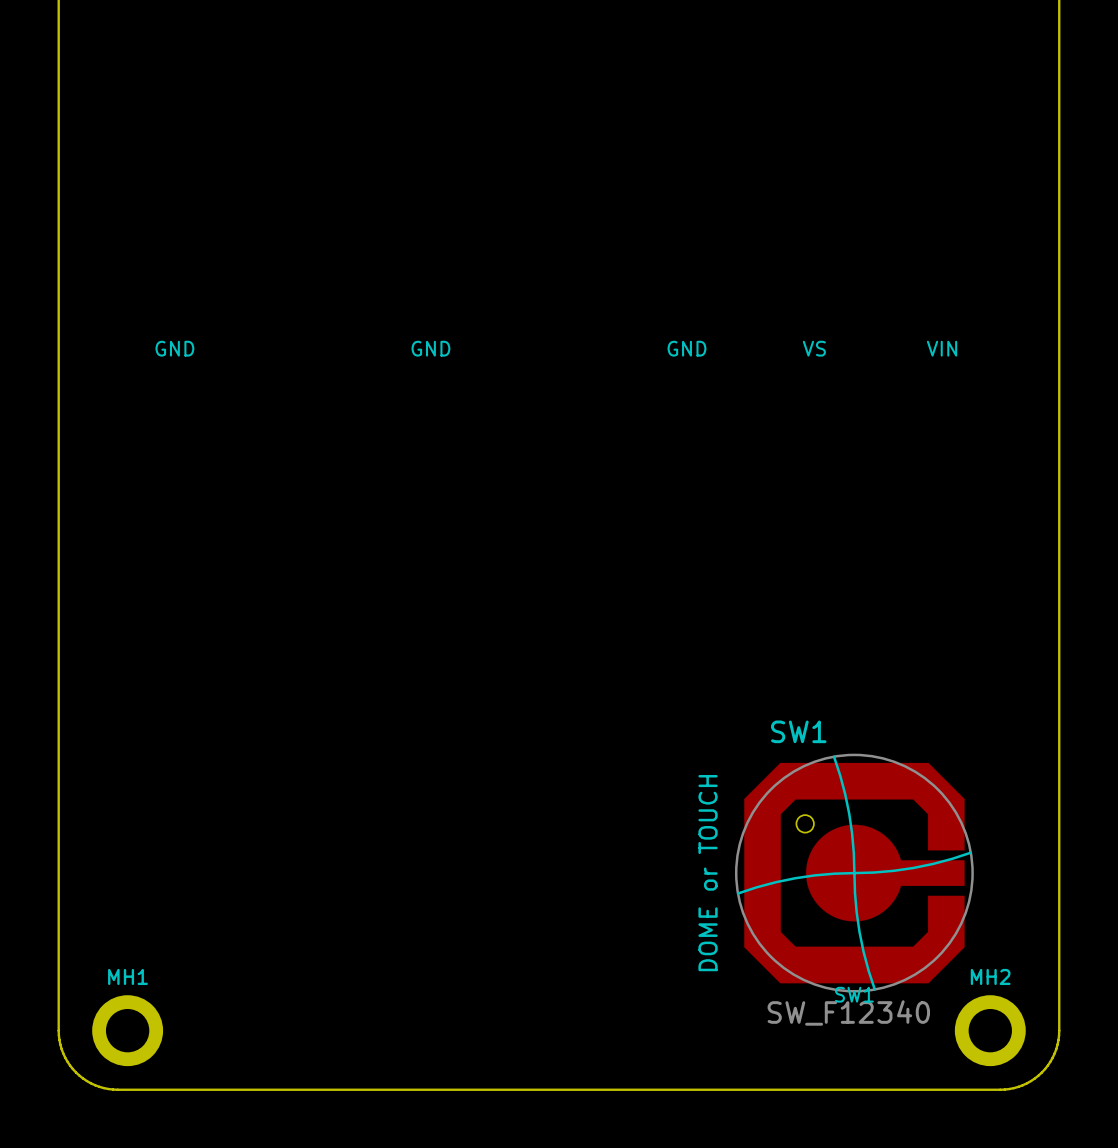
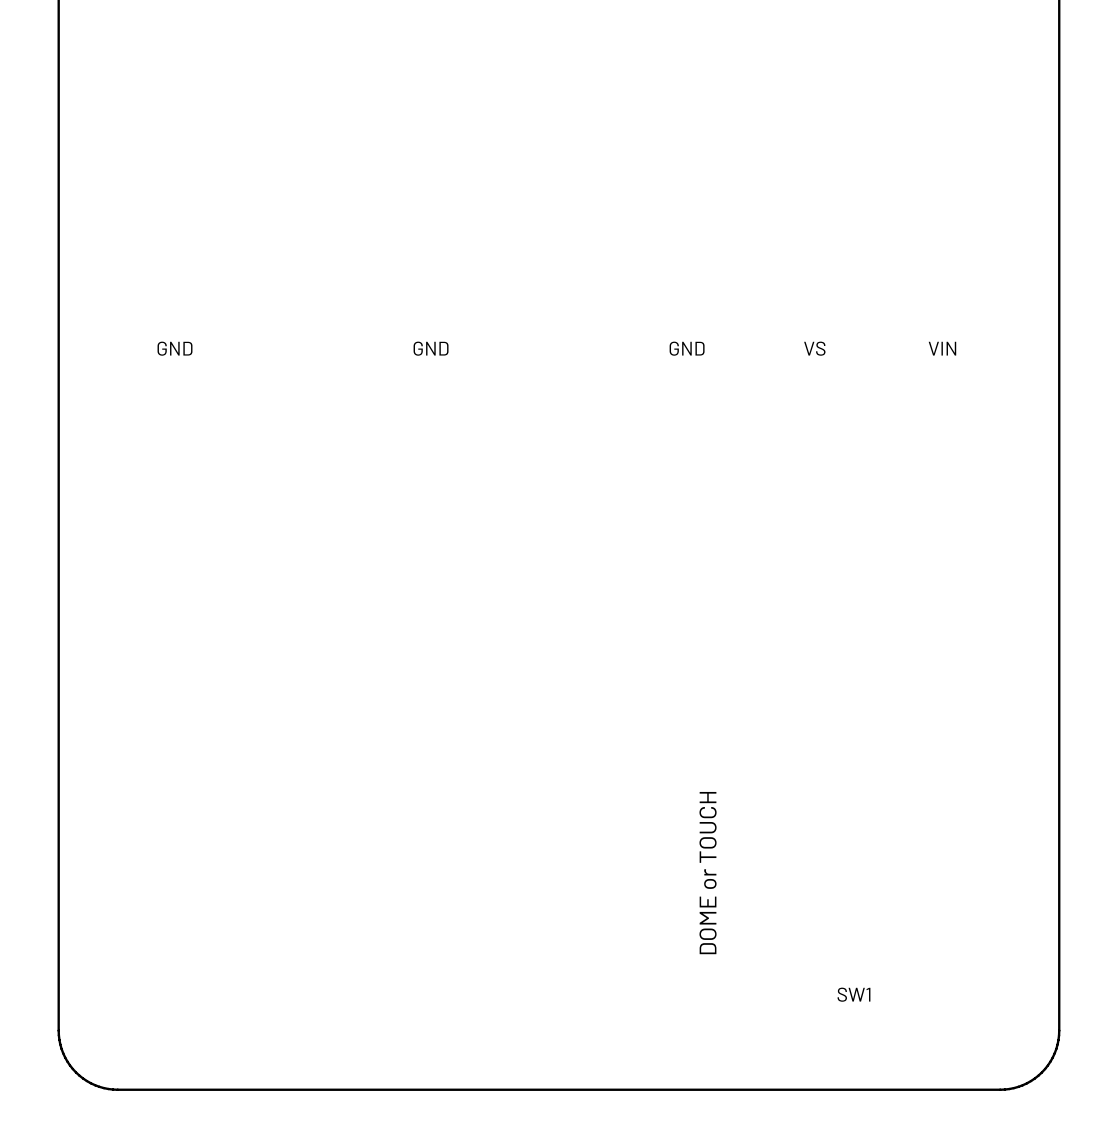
SW1: SW_F12340 (854, 873) -> none
MH1: (127, 1030) -> none
MH2: (990, 1030) -> none

